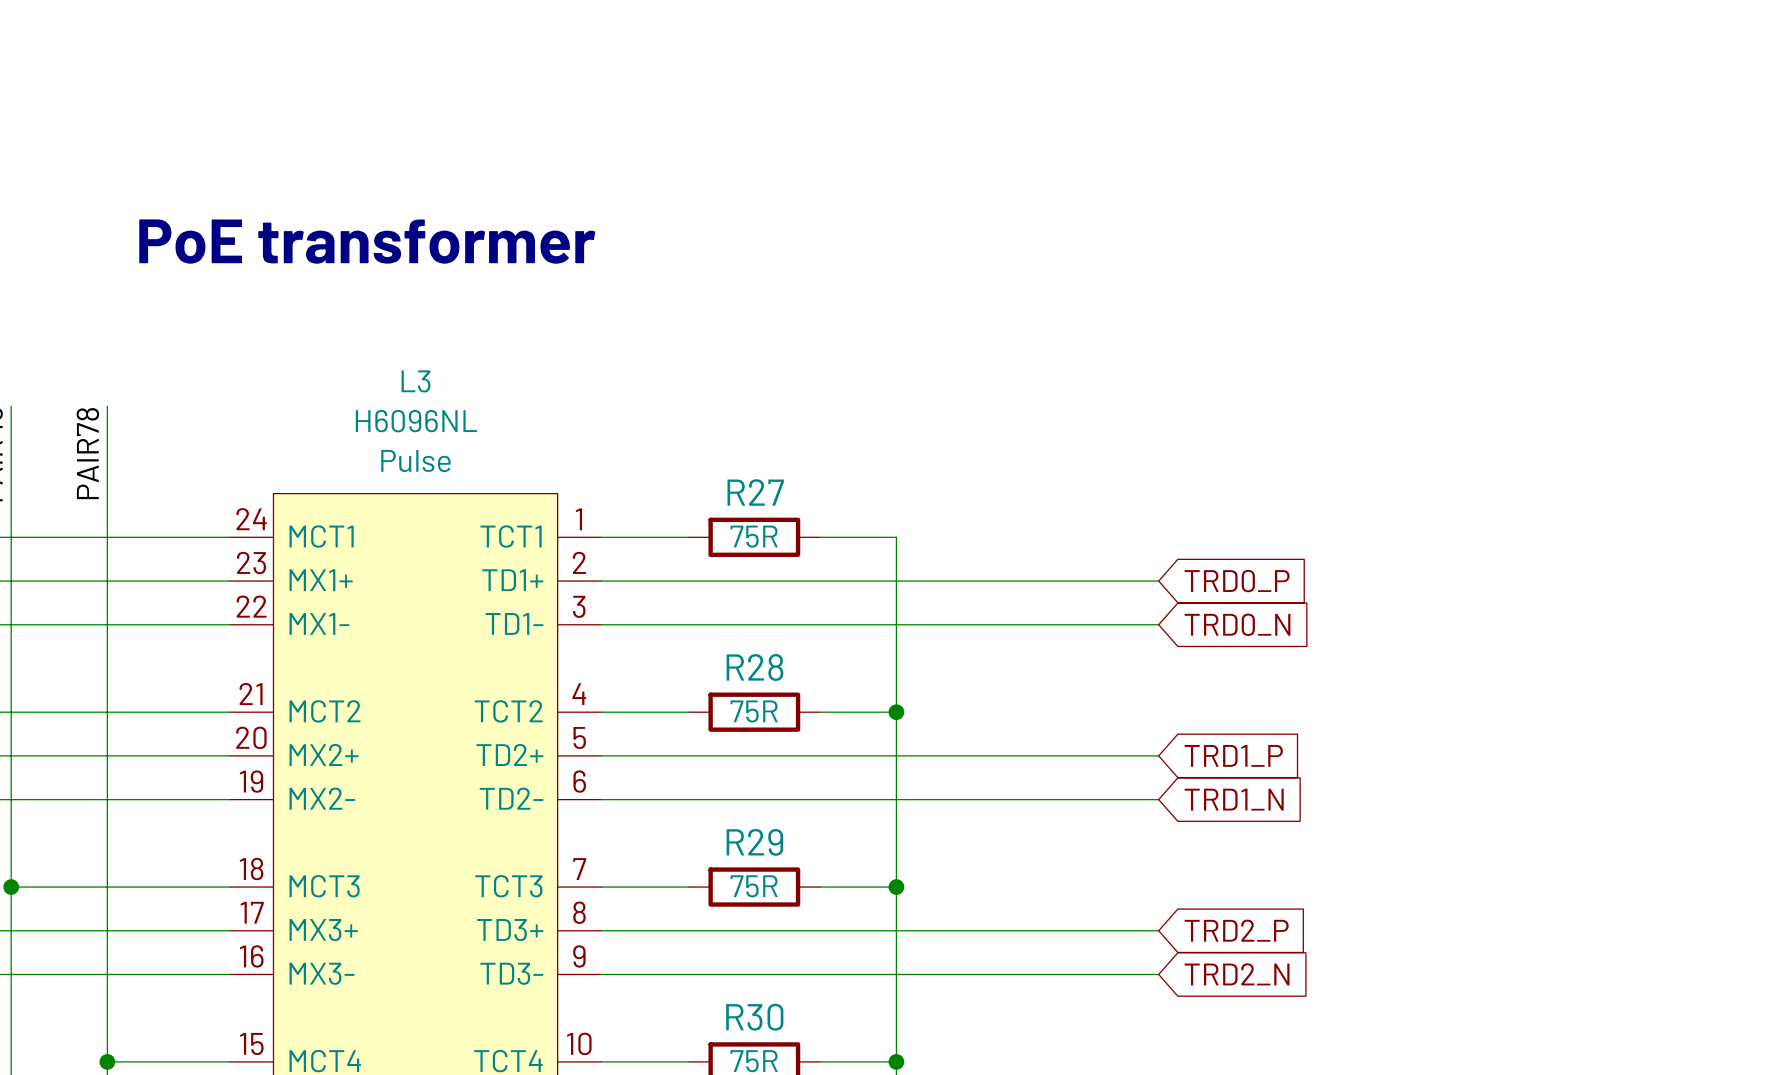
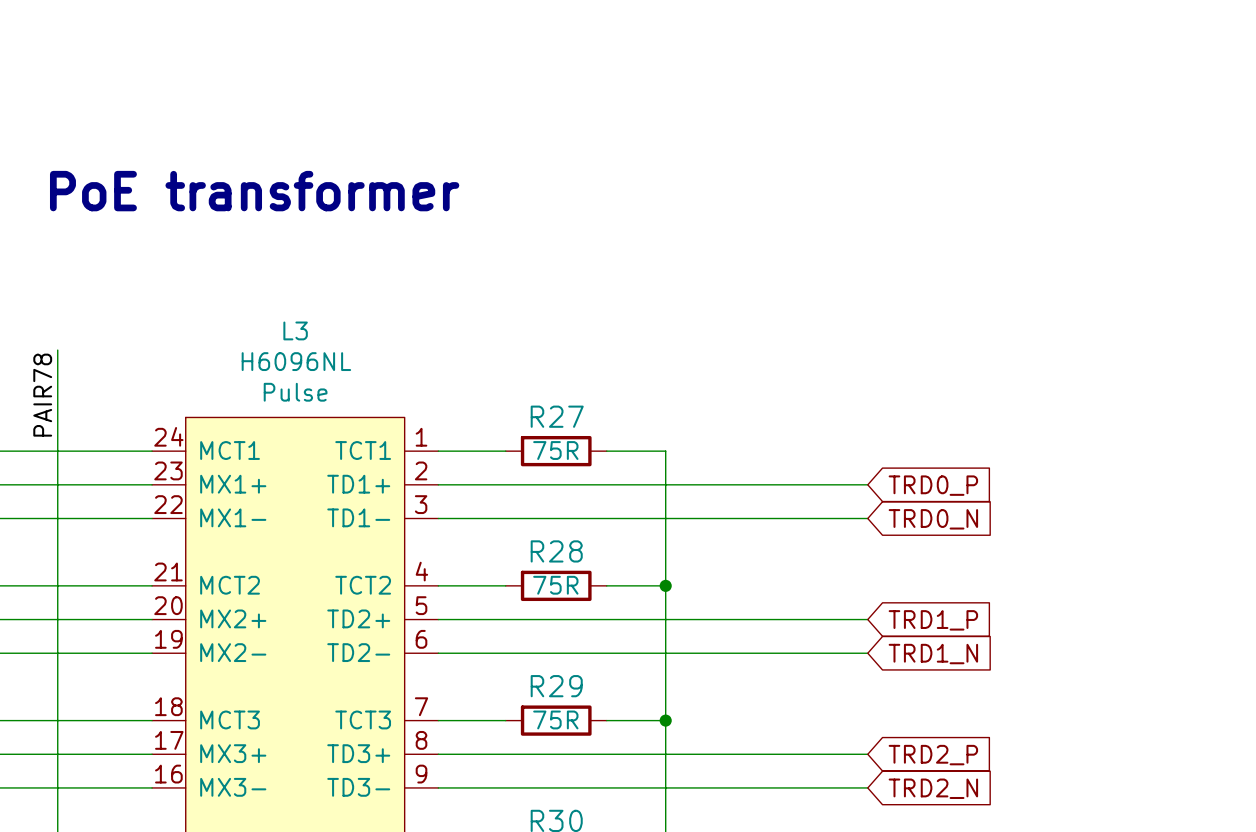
text position: PoE transformer (367, 241) -> PoE transformer (254, 191)

